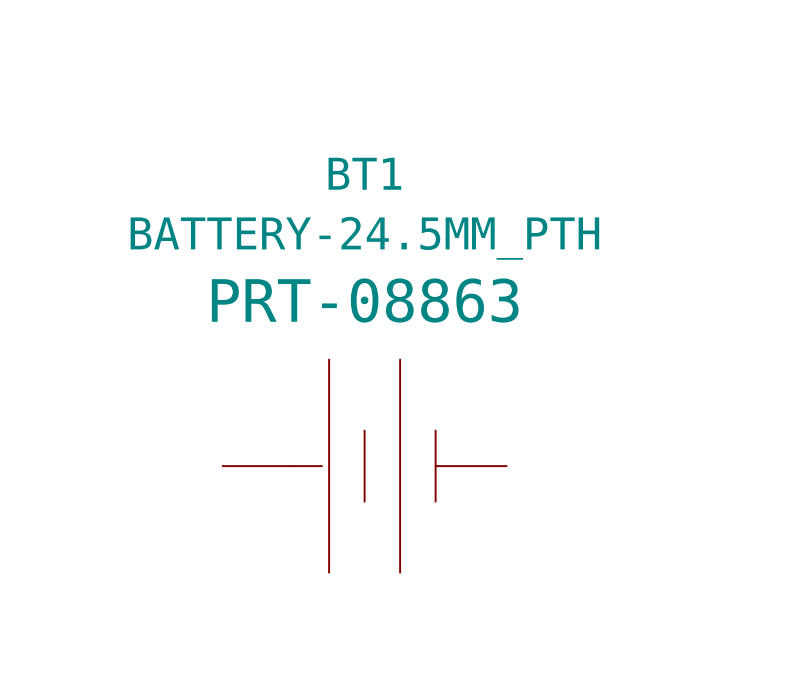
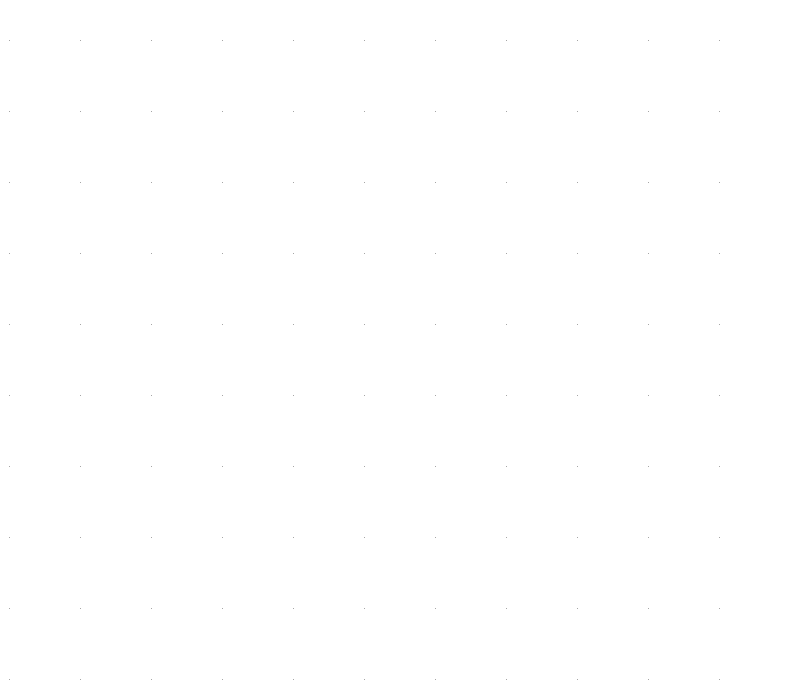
BT1: BATTERY-24.5MM_PTH (364, 466) -> none

